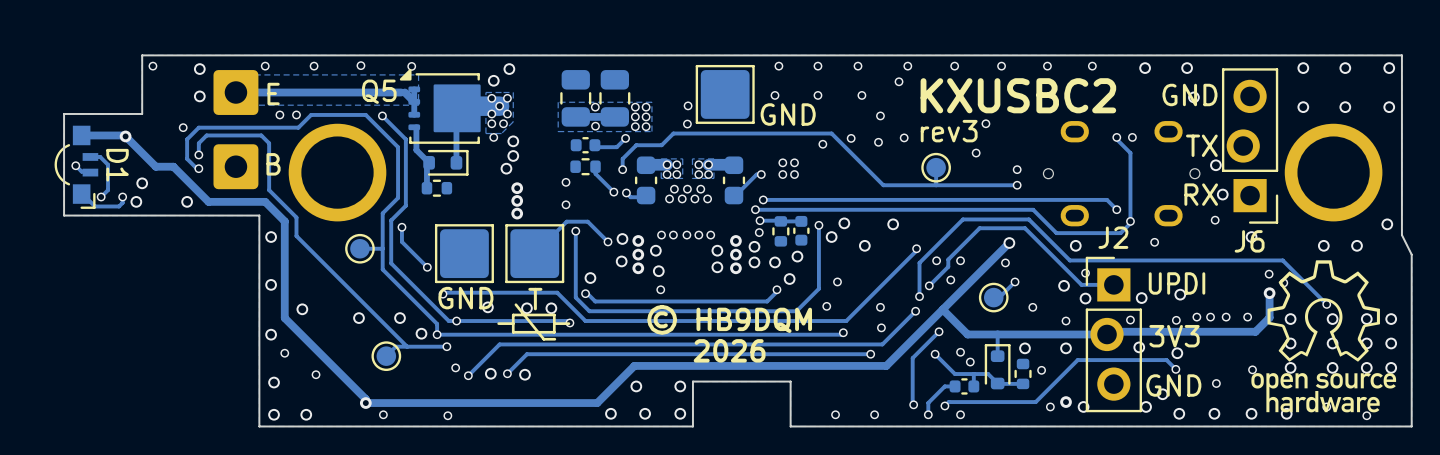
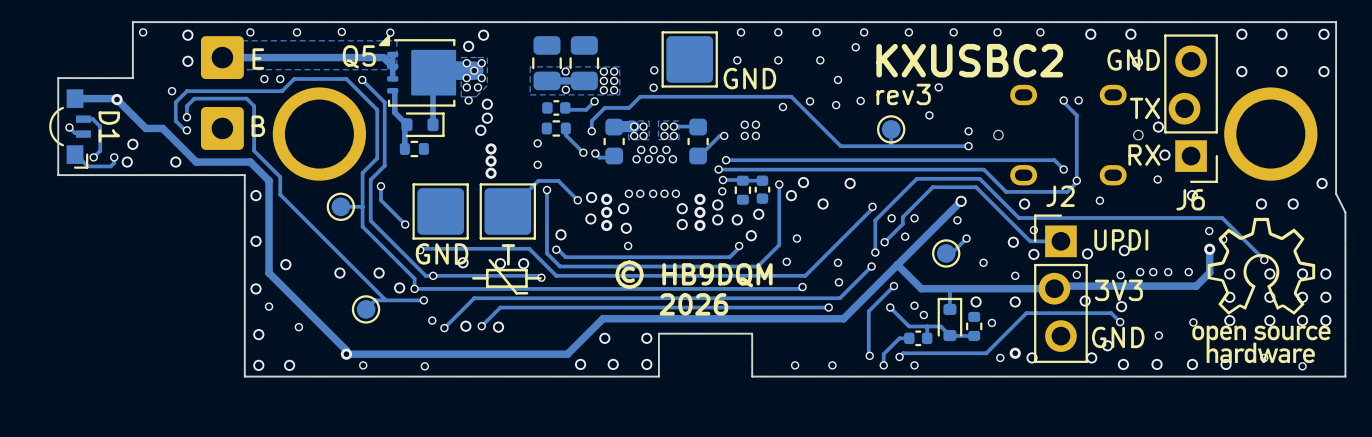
track width: thick (733, 164) (708, 164) -> thin (697, 126) (673, 126)

